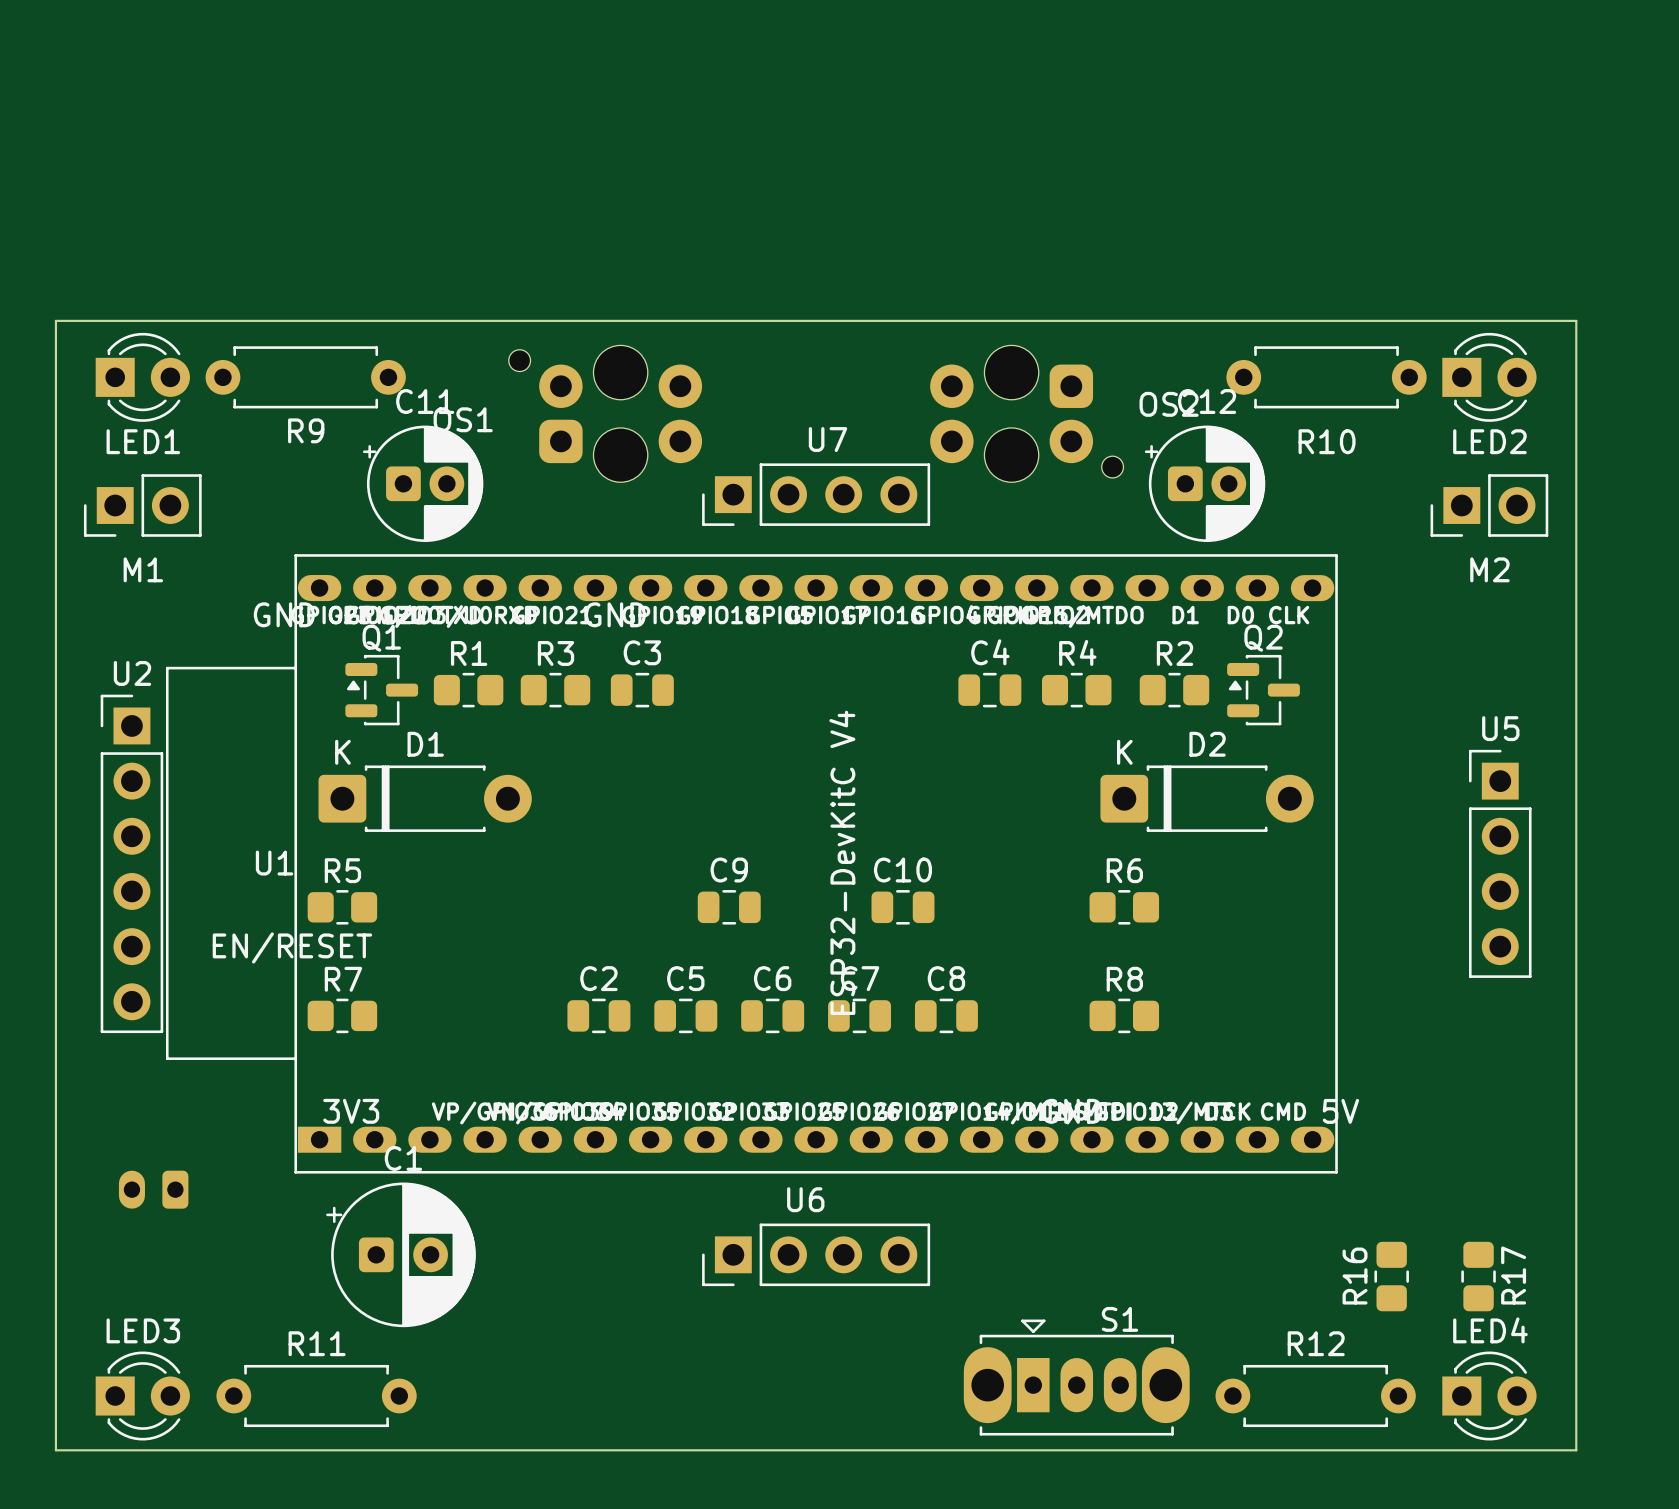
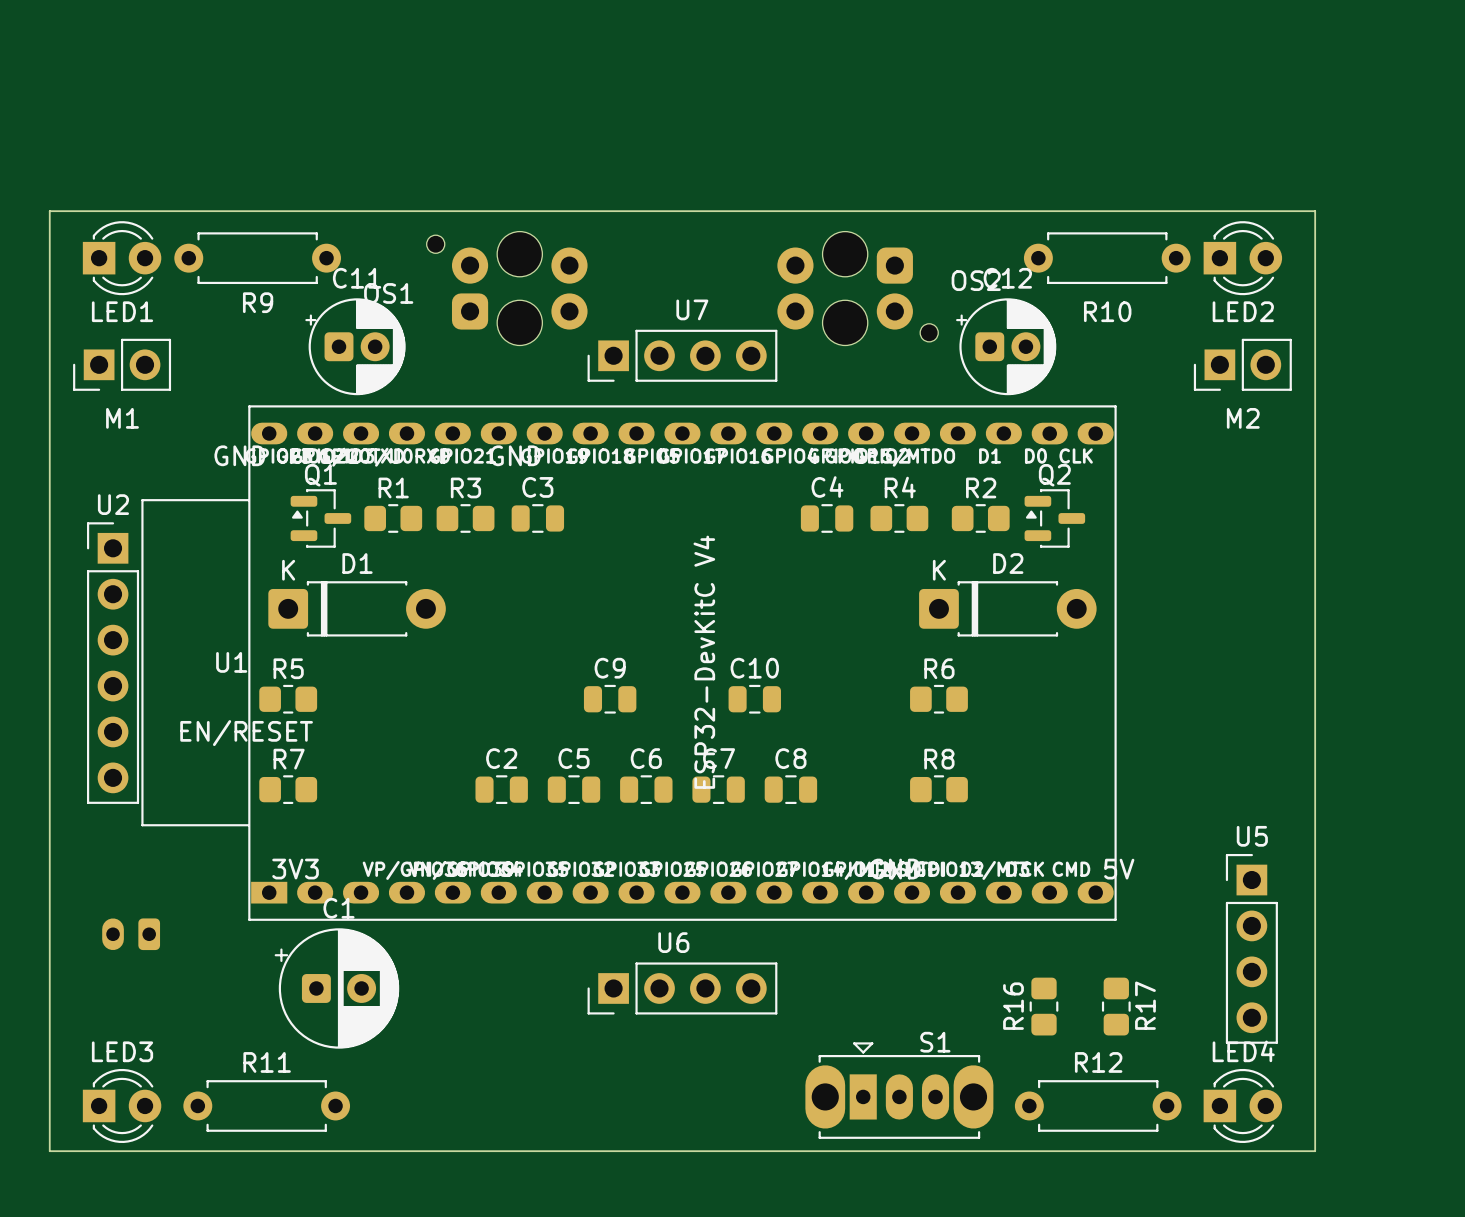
U5 position: (1500, 863) -> (1251, 948)
R16 position: (1391, 1276) -> (1044, 1006)
R17 position: (1478, 1276) -> (1116, 1006)

